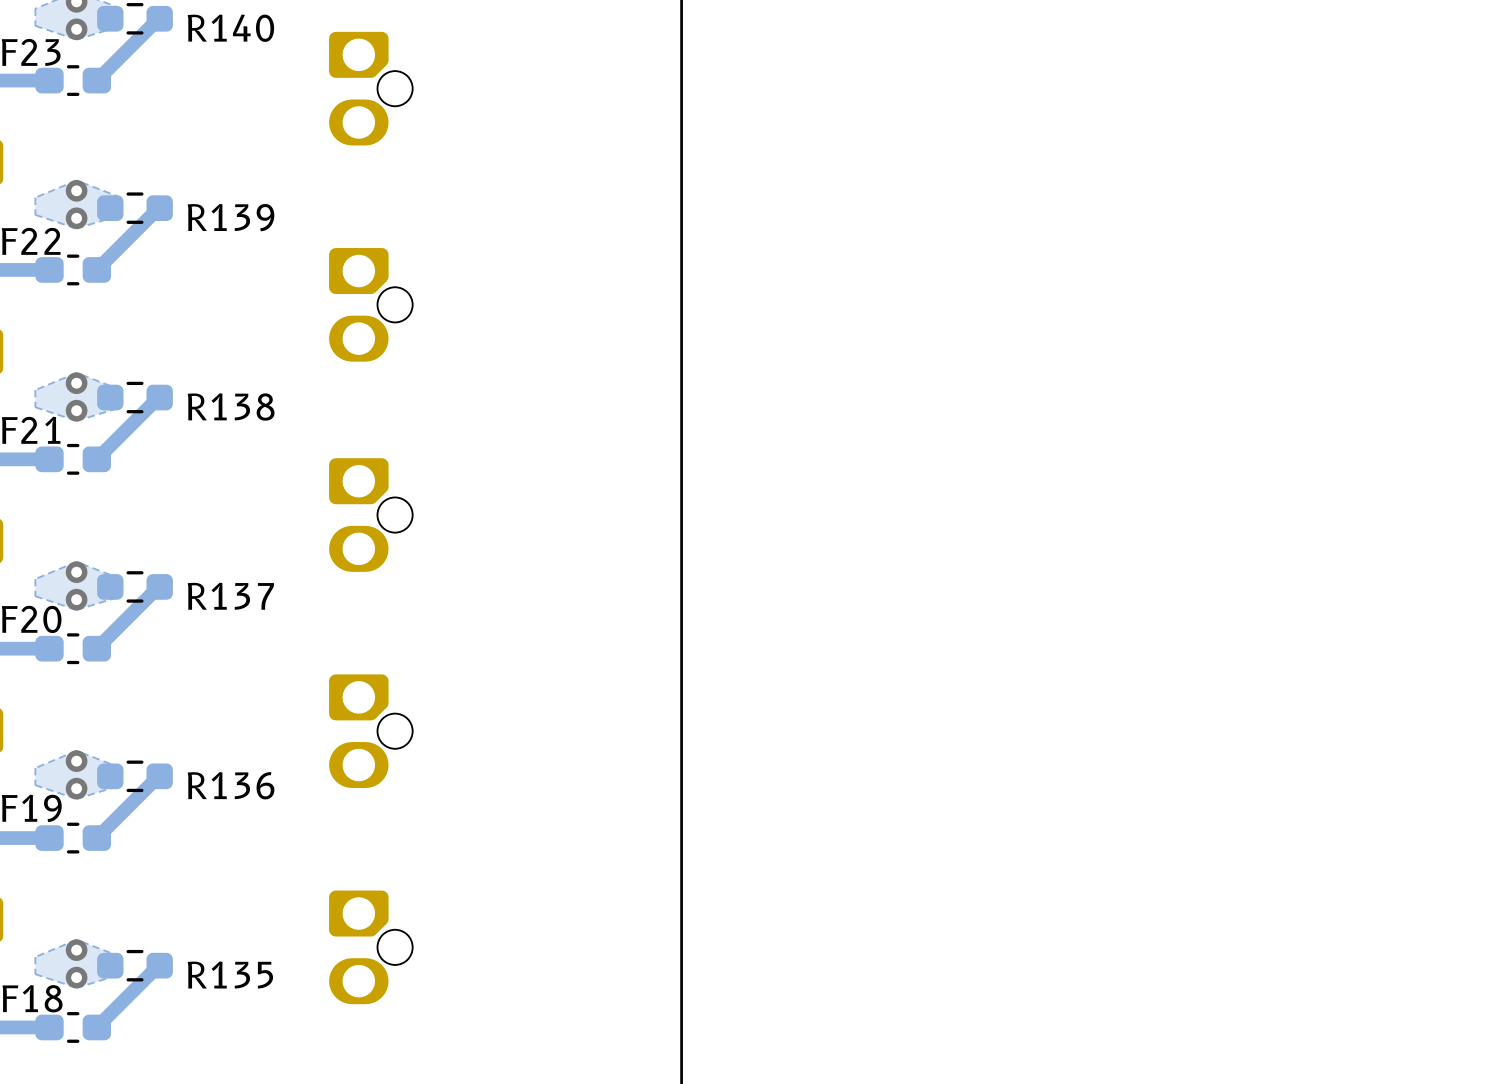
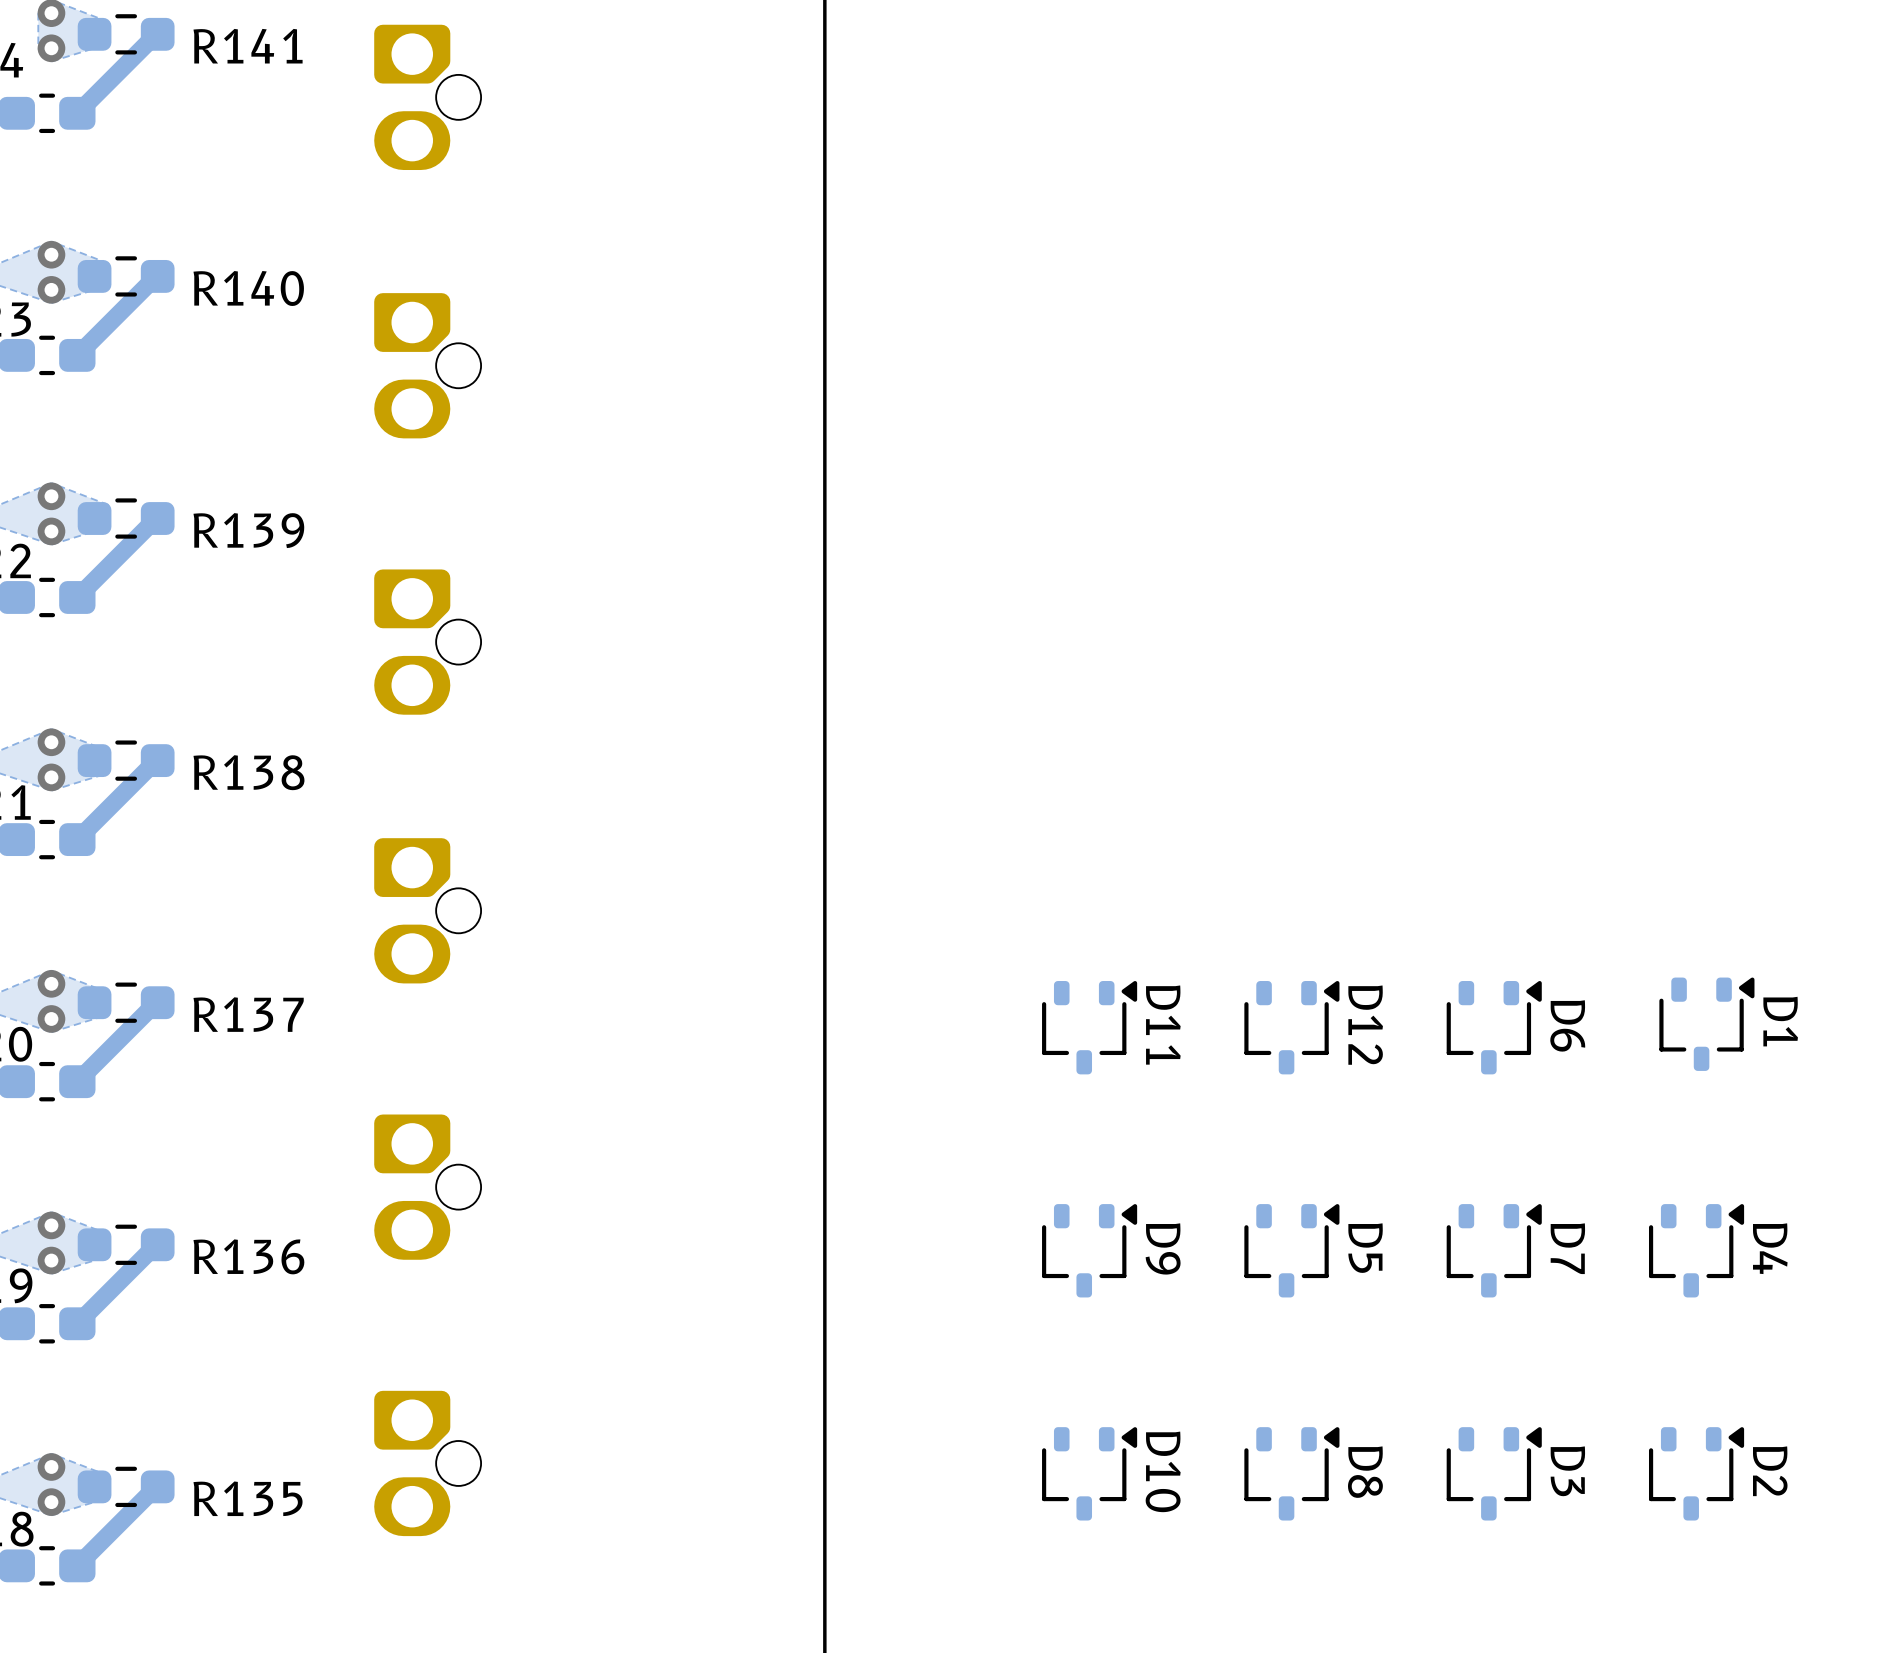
D1: none -> (1706, 1024)
D11: none -> (1089, 1027)
D12: none -> (1291, 1027)
D6: none -> (1494, 1027)
D9: none -> (1089, 1250)
D5: none -> (1291, 1250)
D7: none -> (1494, 1250)
D4: none -> (1696, 1250)
D10: none -> (1089, 1473)
D8: none -> (1291, 1473)
D3: none -> (1494, 1473)
D2: none -> (1696, 1473)

